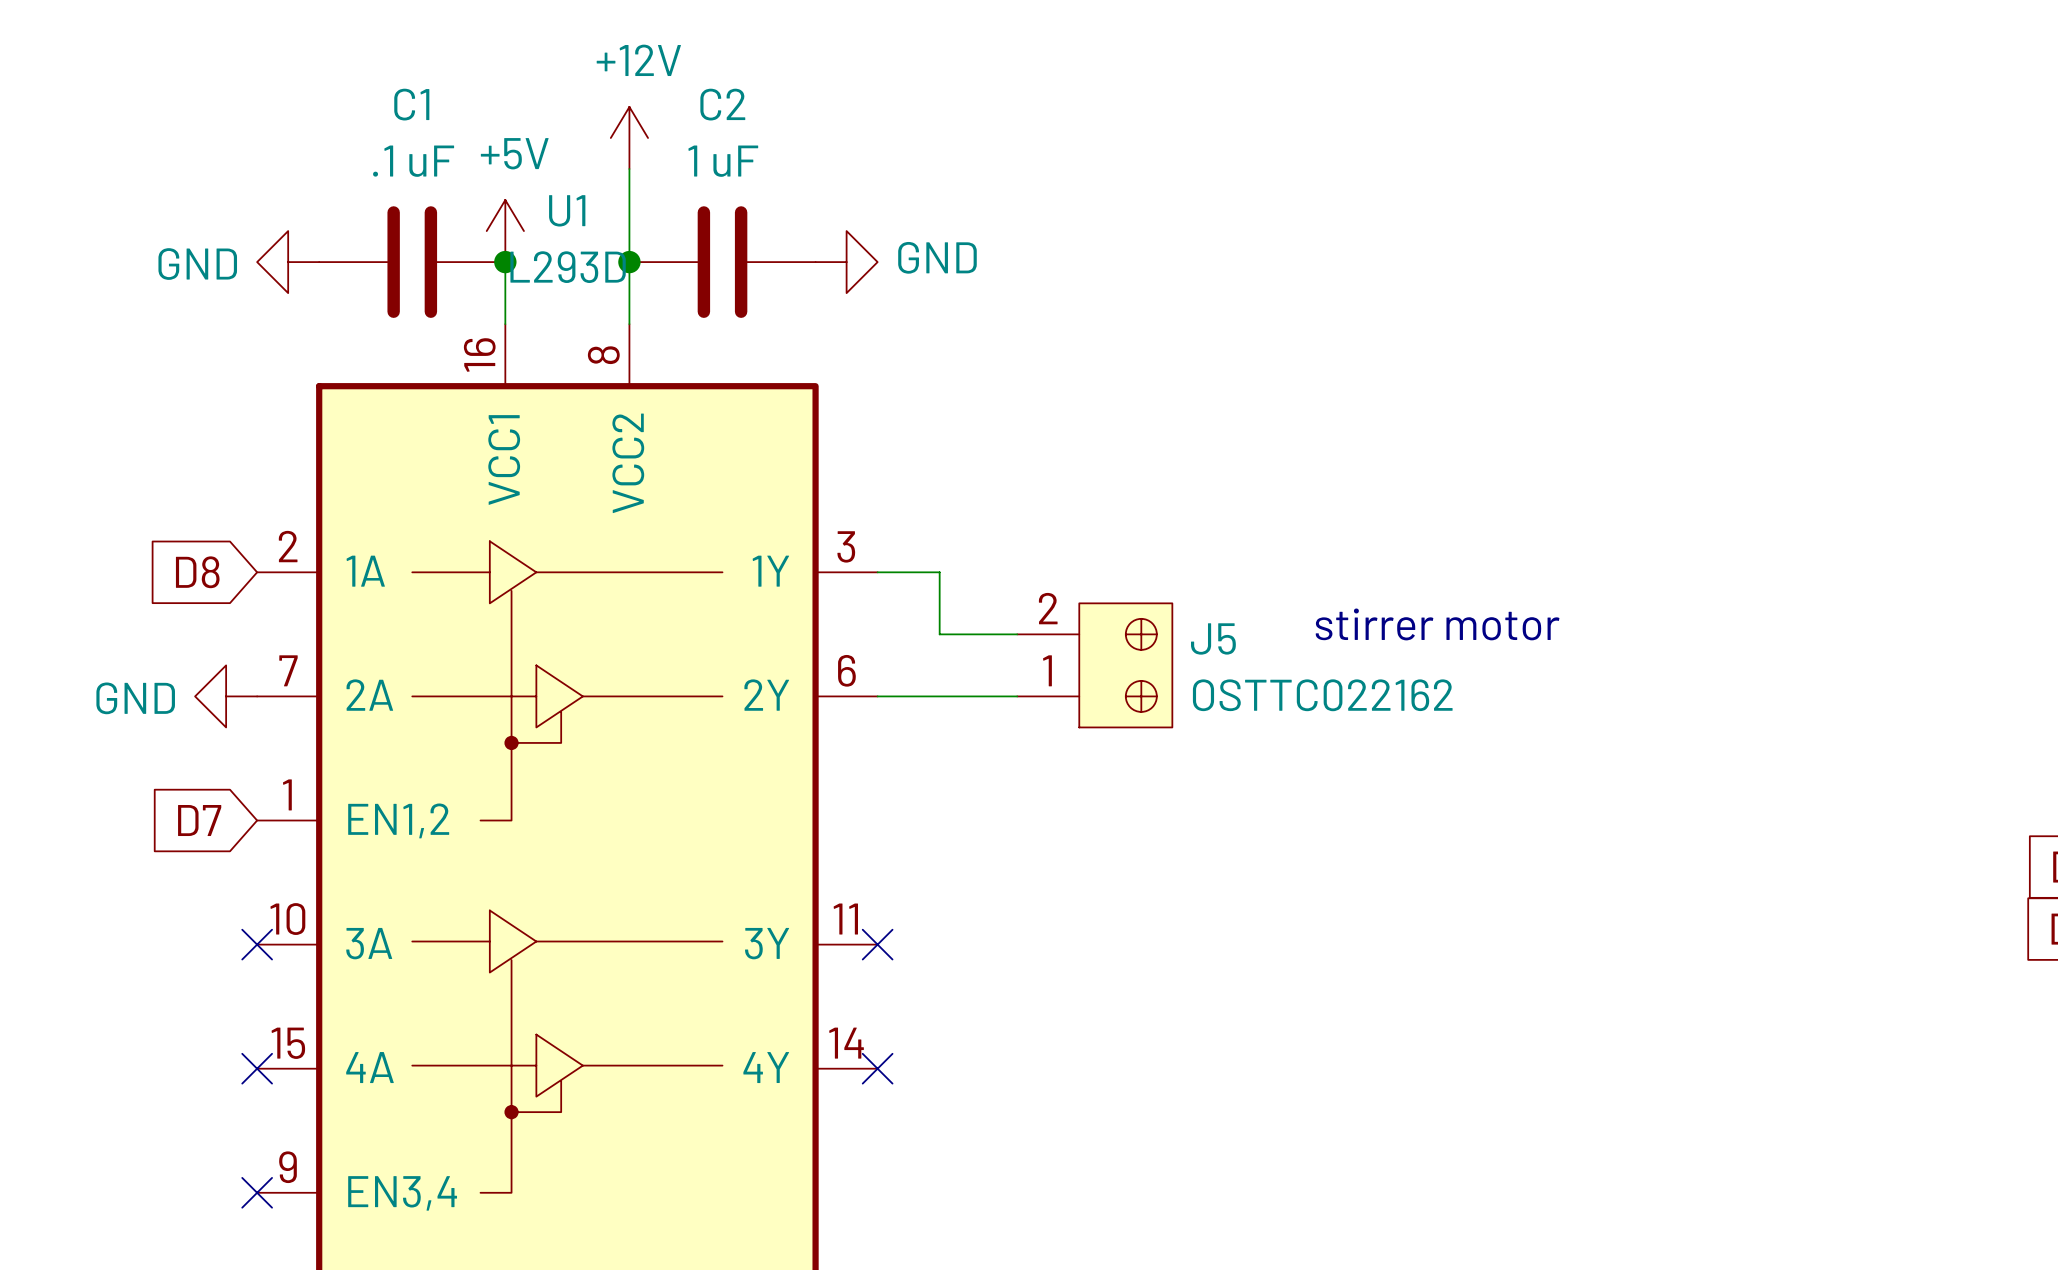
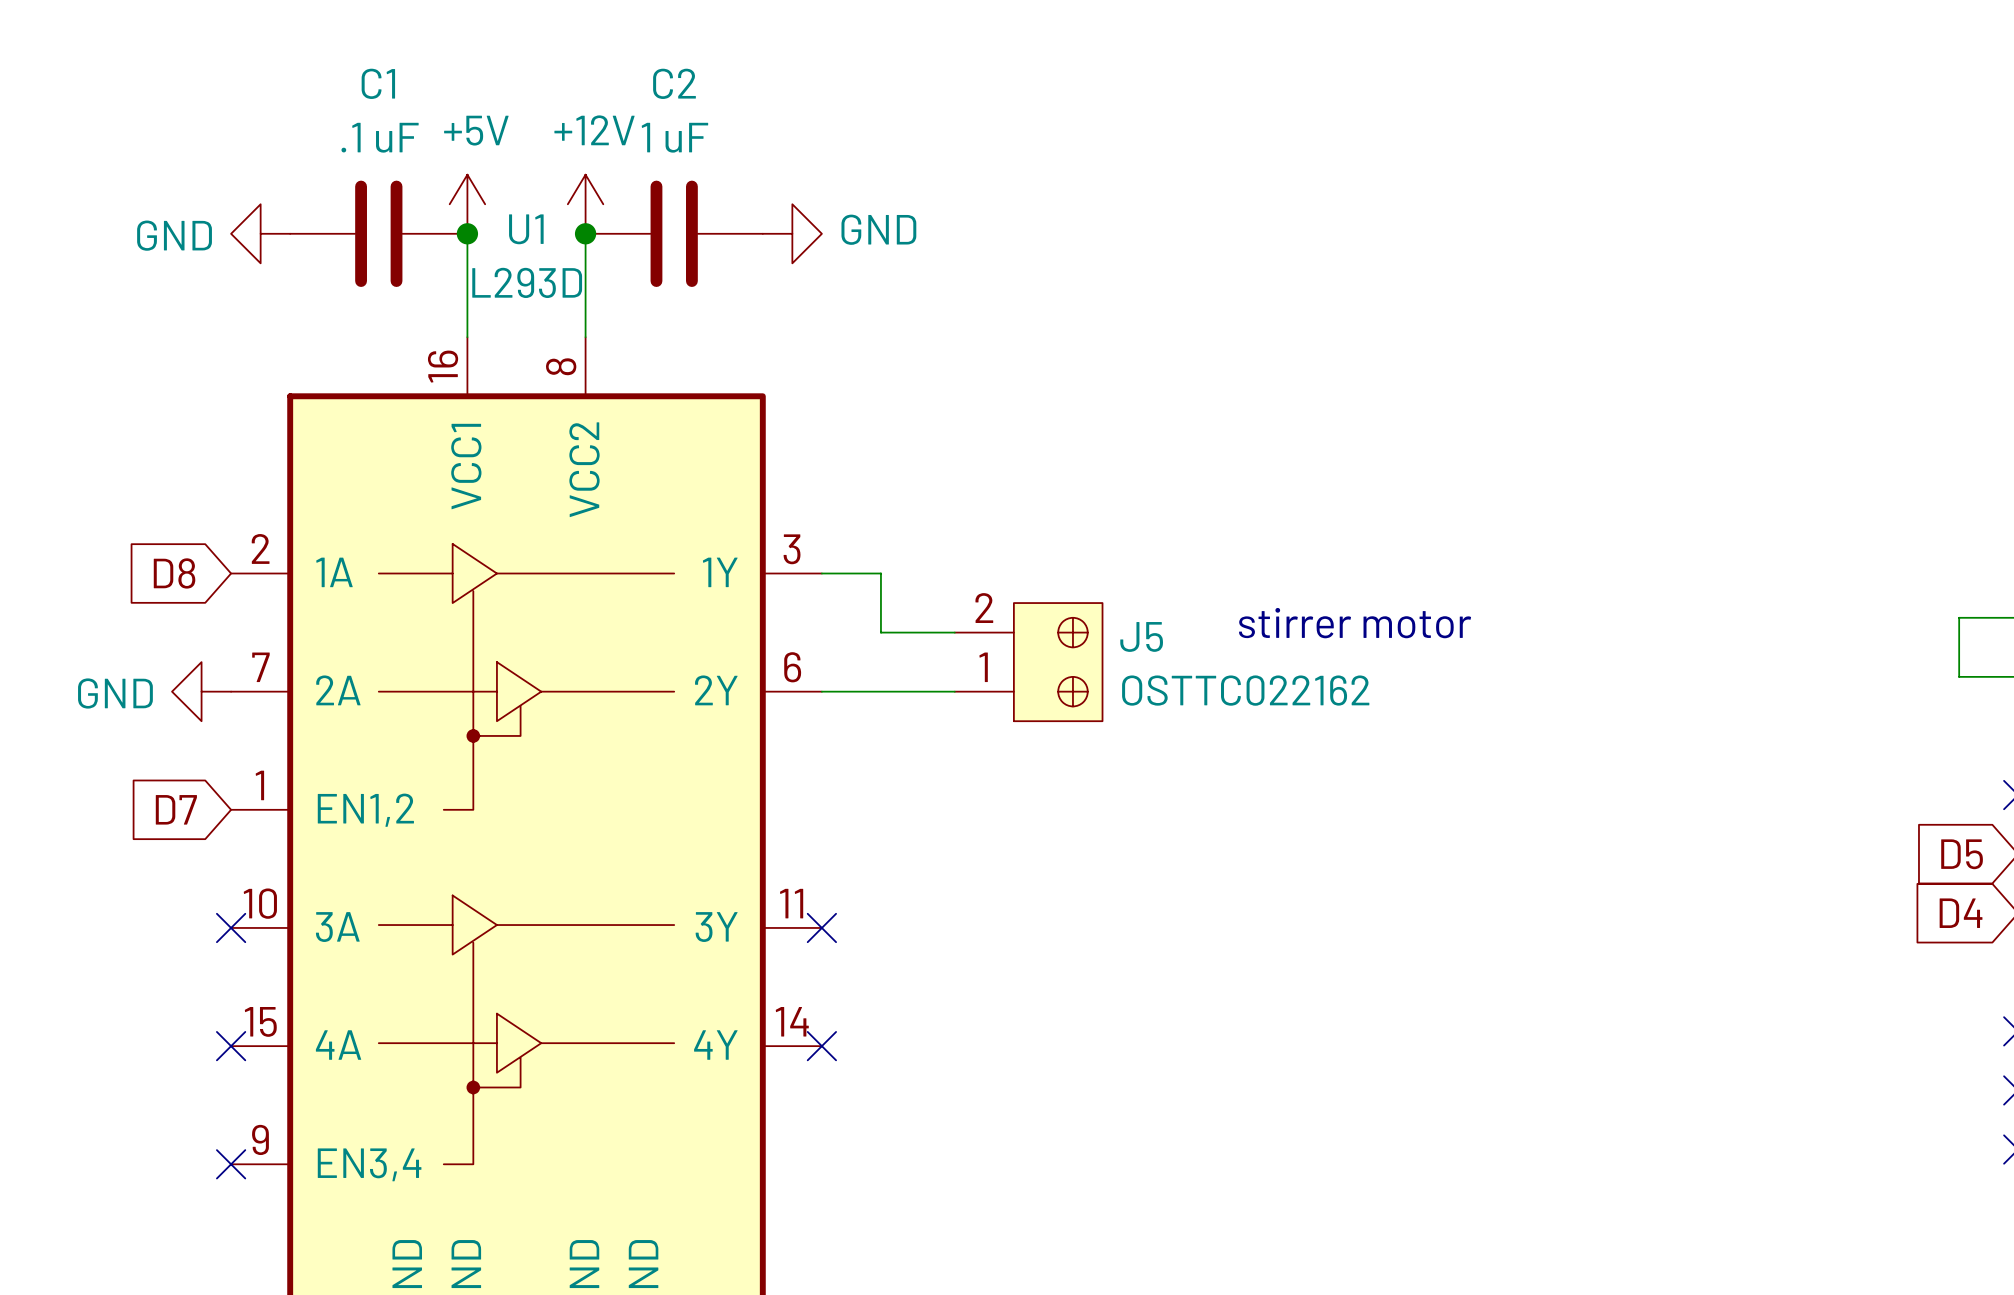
power symbol position: +12V (629, 137) -> +12V (585, 204)
power symbol position: +5V (505, 231) -> +5V (467, 204)
power symbol position: GND (288, 262) -> GND (260, 233)
C1 position: (412, 262) -> (378, 233)
junction position: (505, 262) -> (467, 233)
junction position: (629, 262) -> (585, 233)
C2 position: (722, 262) -> (674, 233)
power symbol position: GND (846, 262) -> GND (792, 233)

